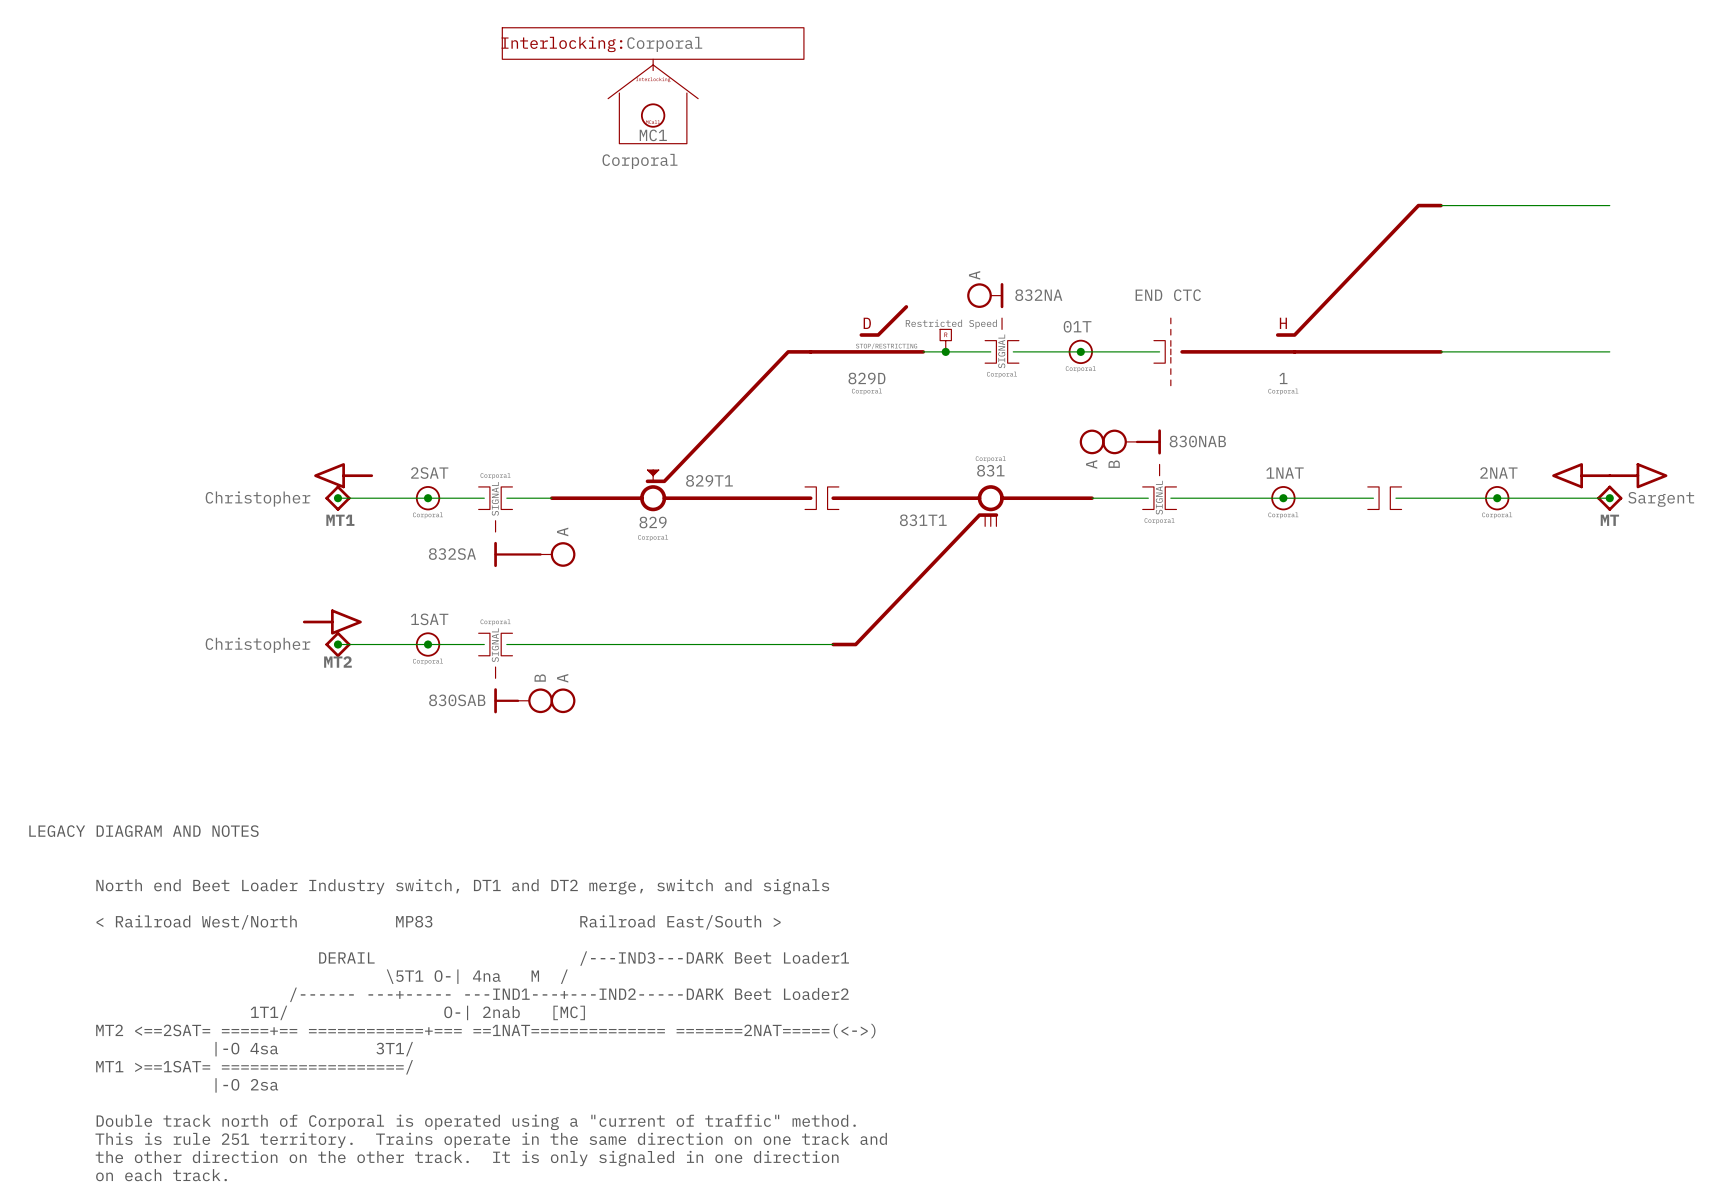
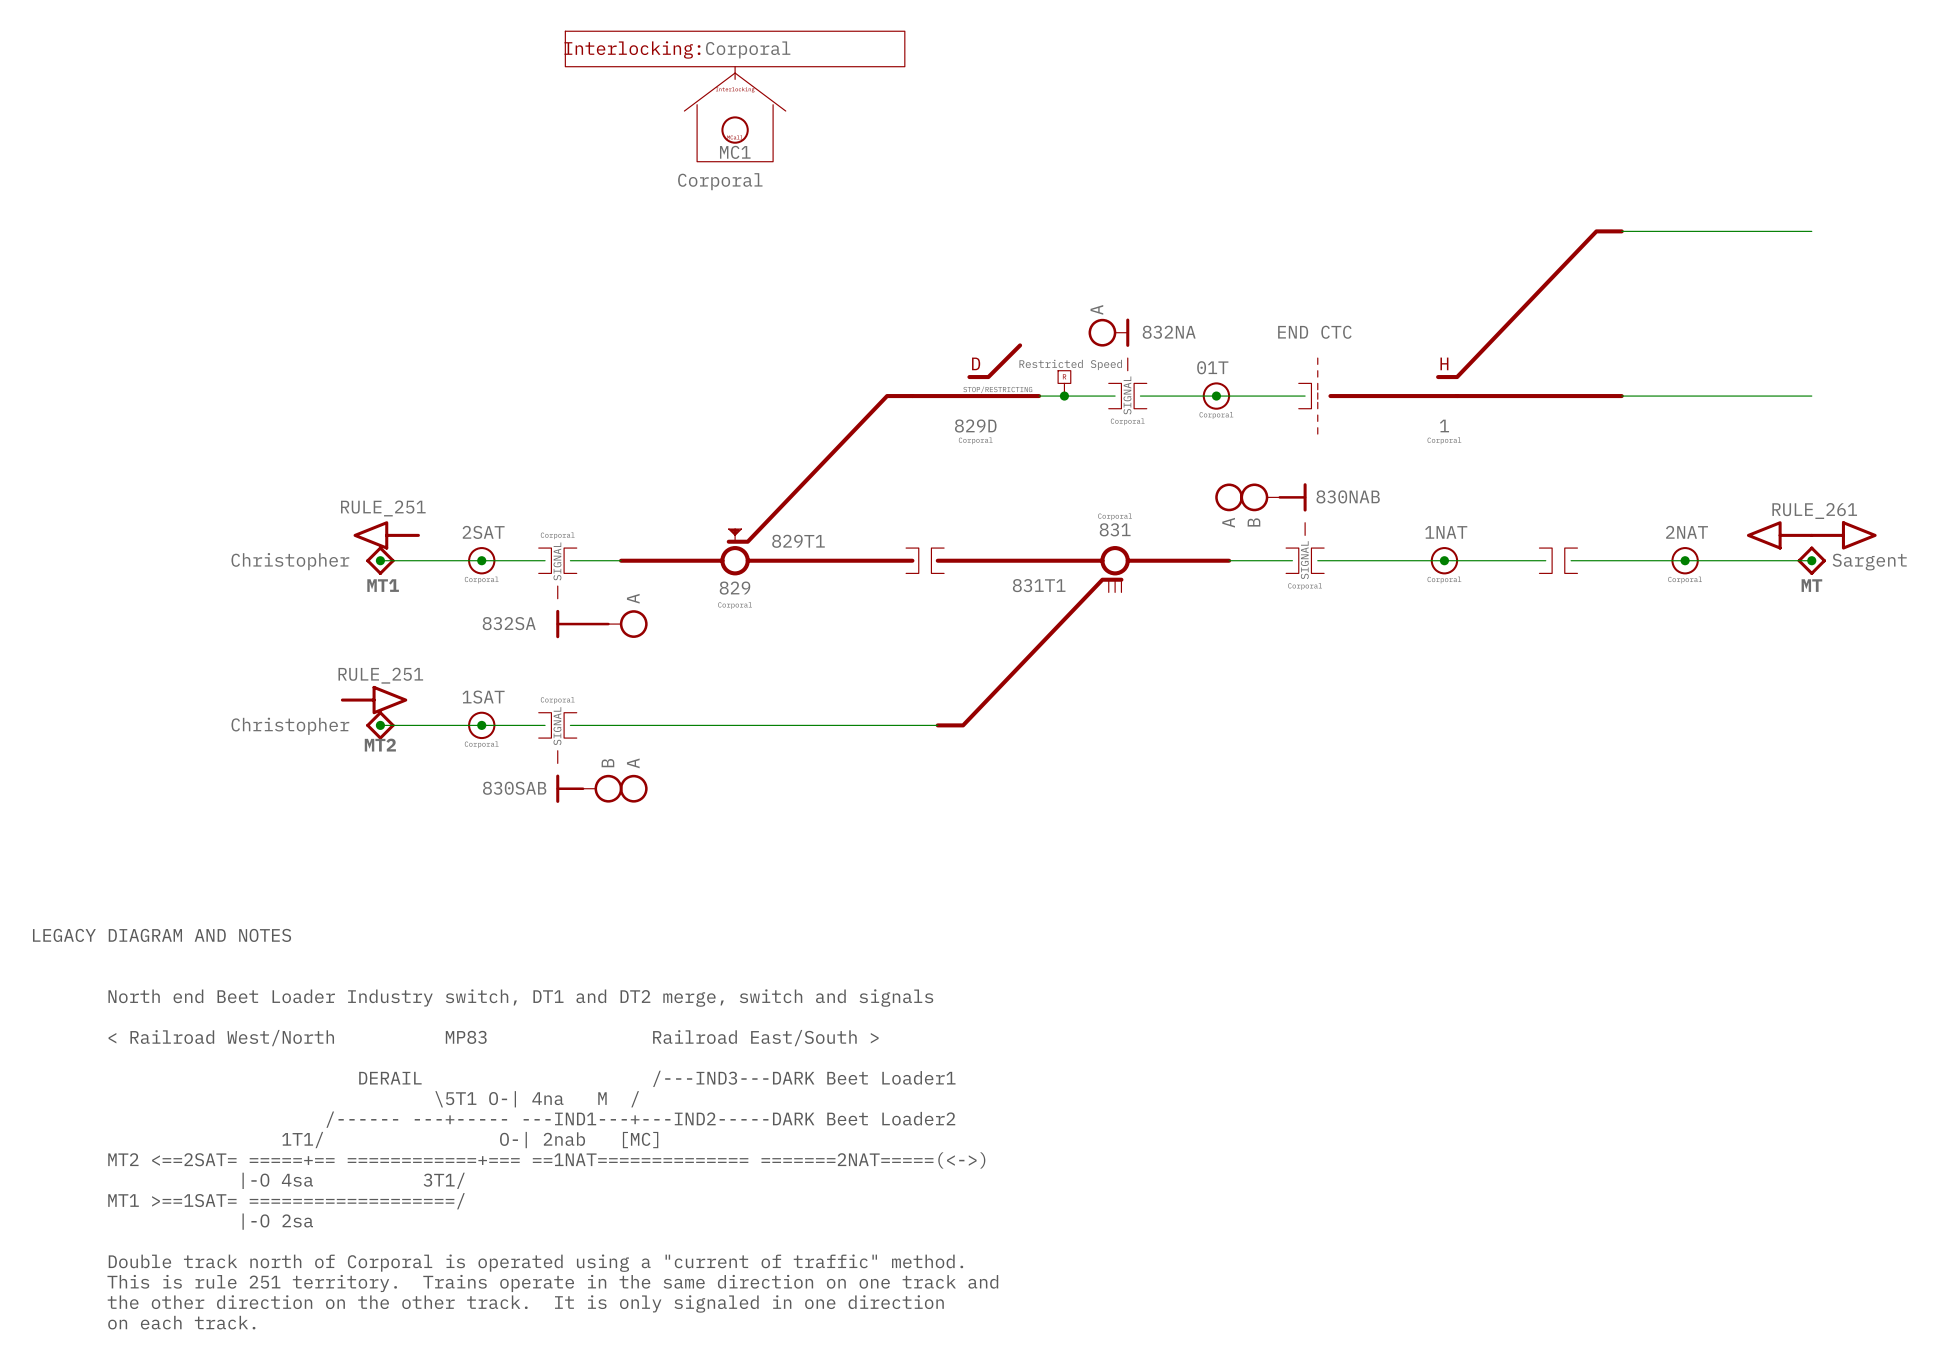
part text: none -> RULE_251 (383, 508)
part text: none -> RULE_261 (1814, 511)
part text: none -> RULE_251 (380, 675)

